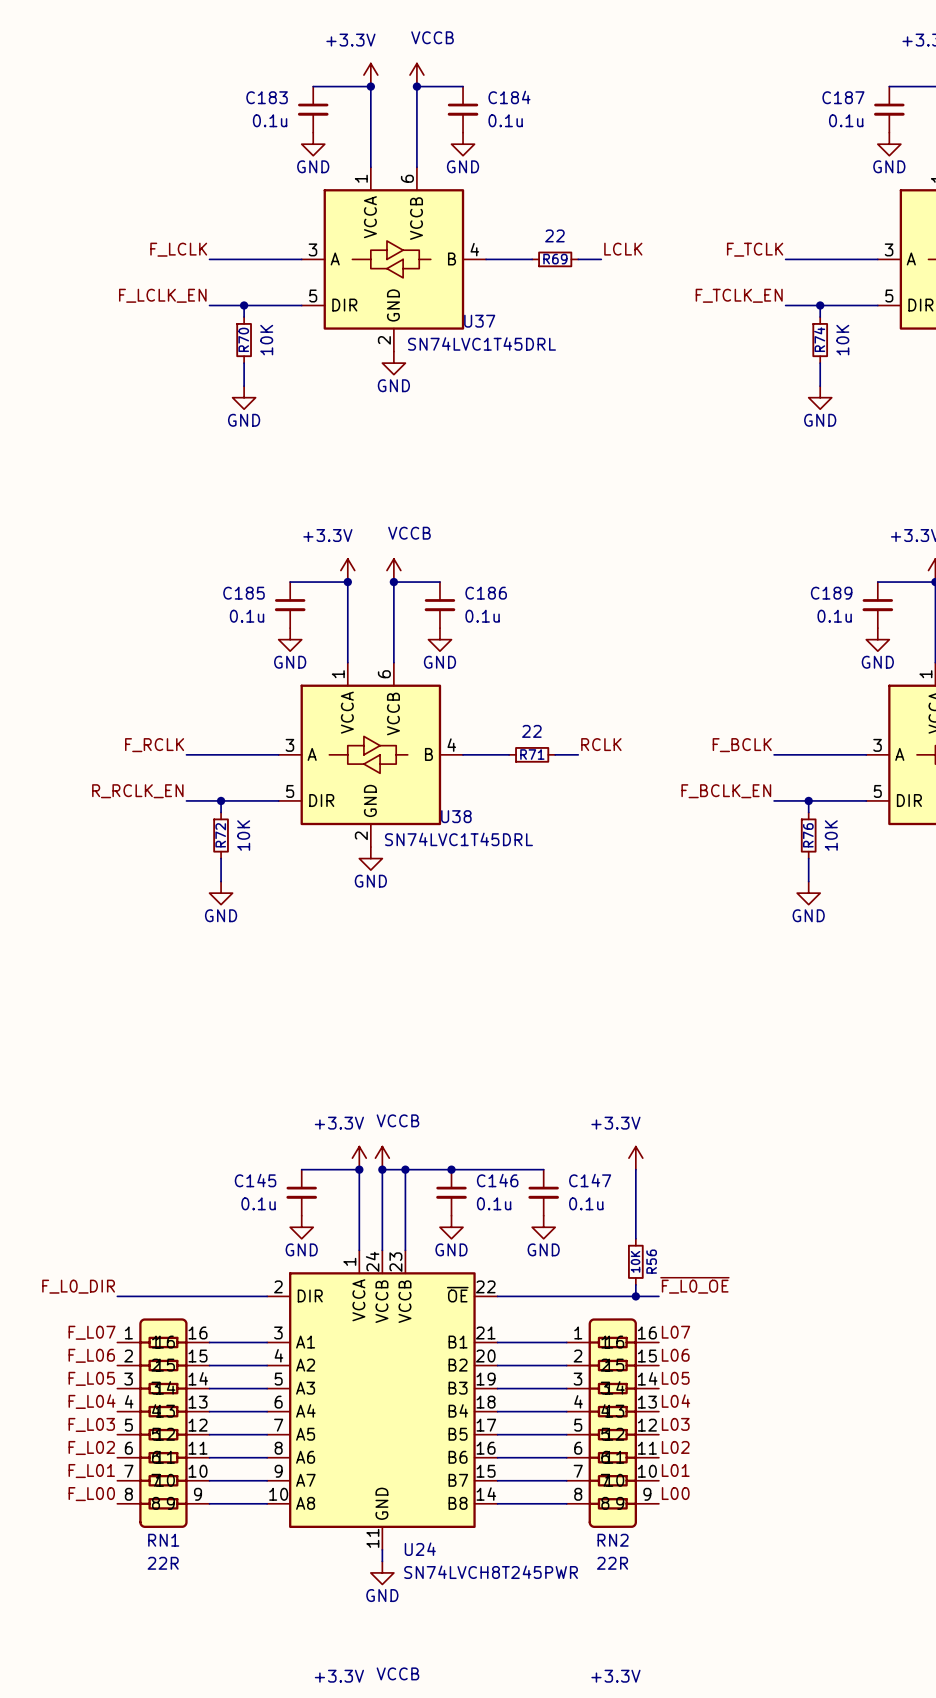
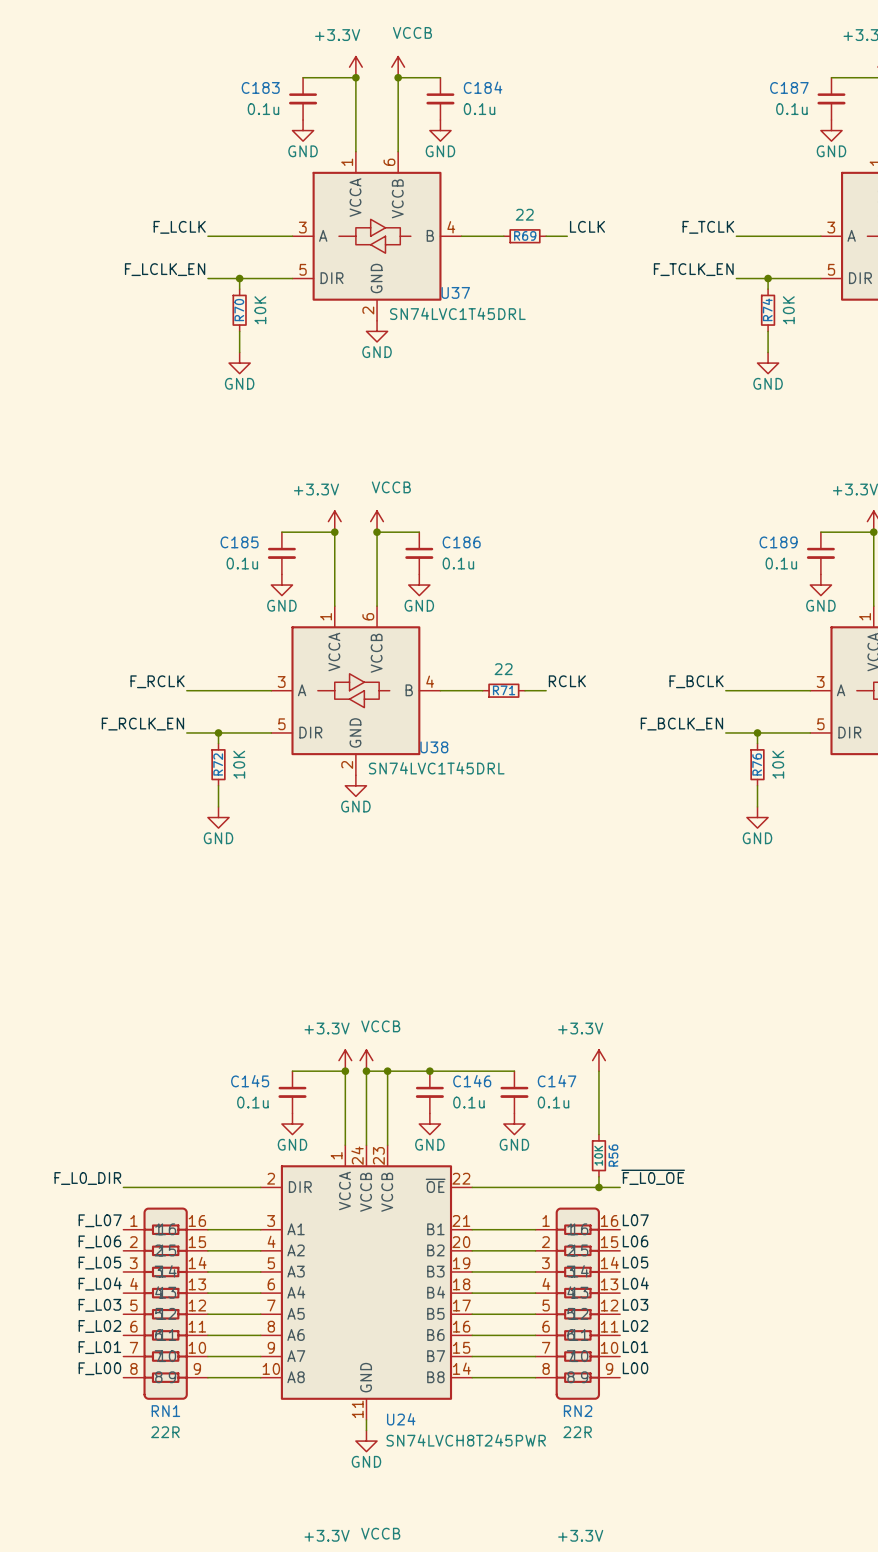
label: R_RCLK_EN (137, 791) -> F_RCLK_EN (142, 724)

